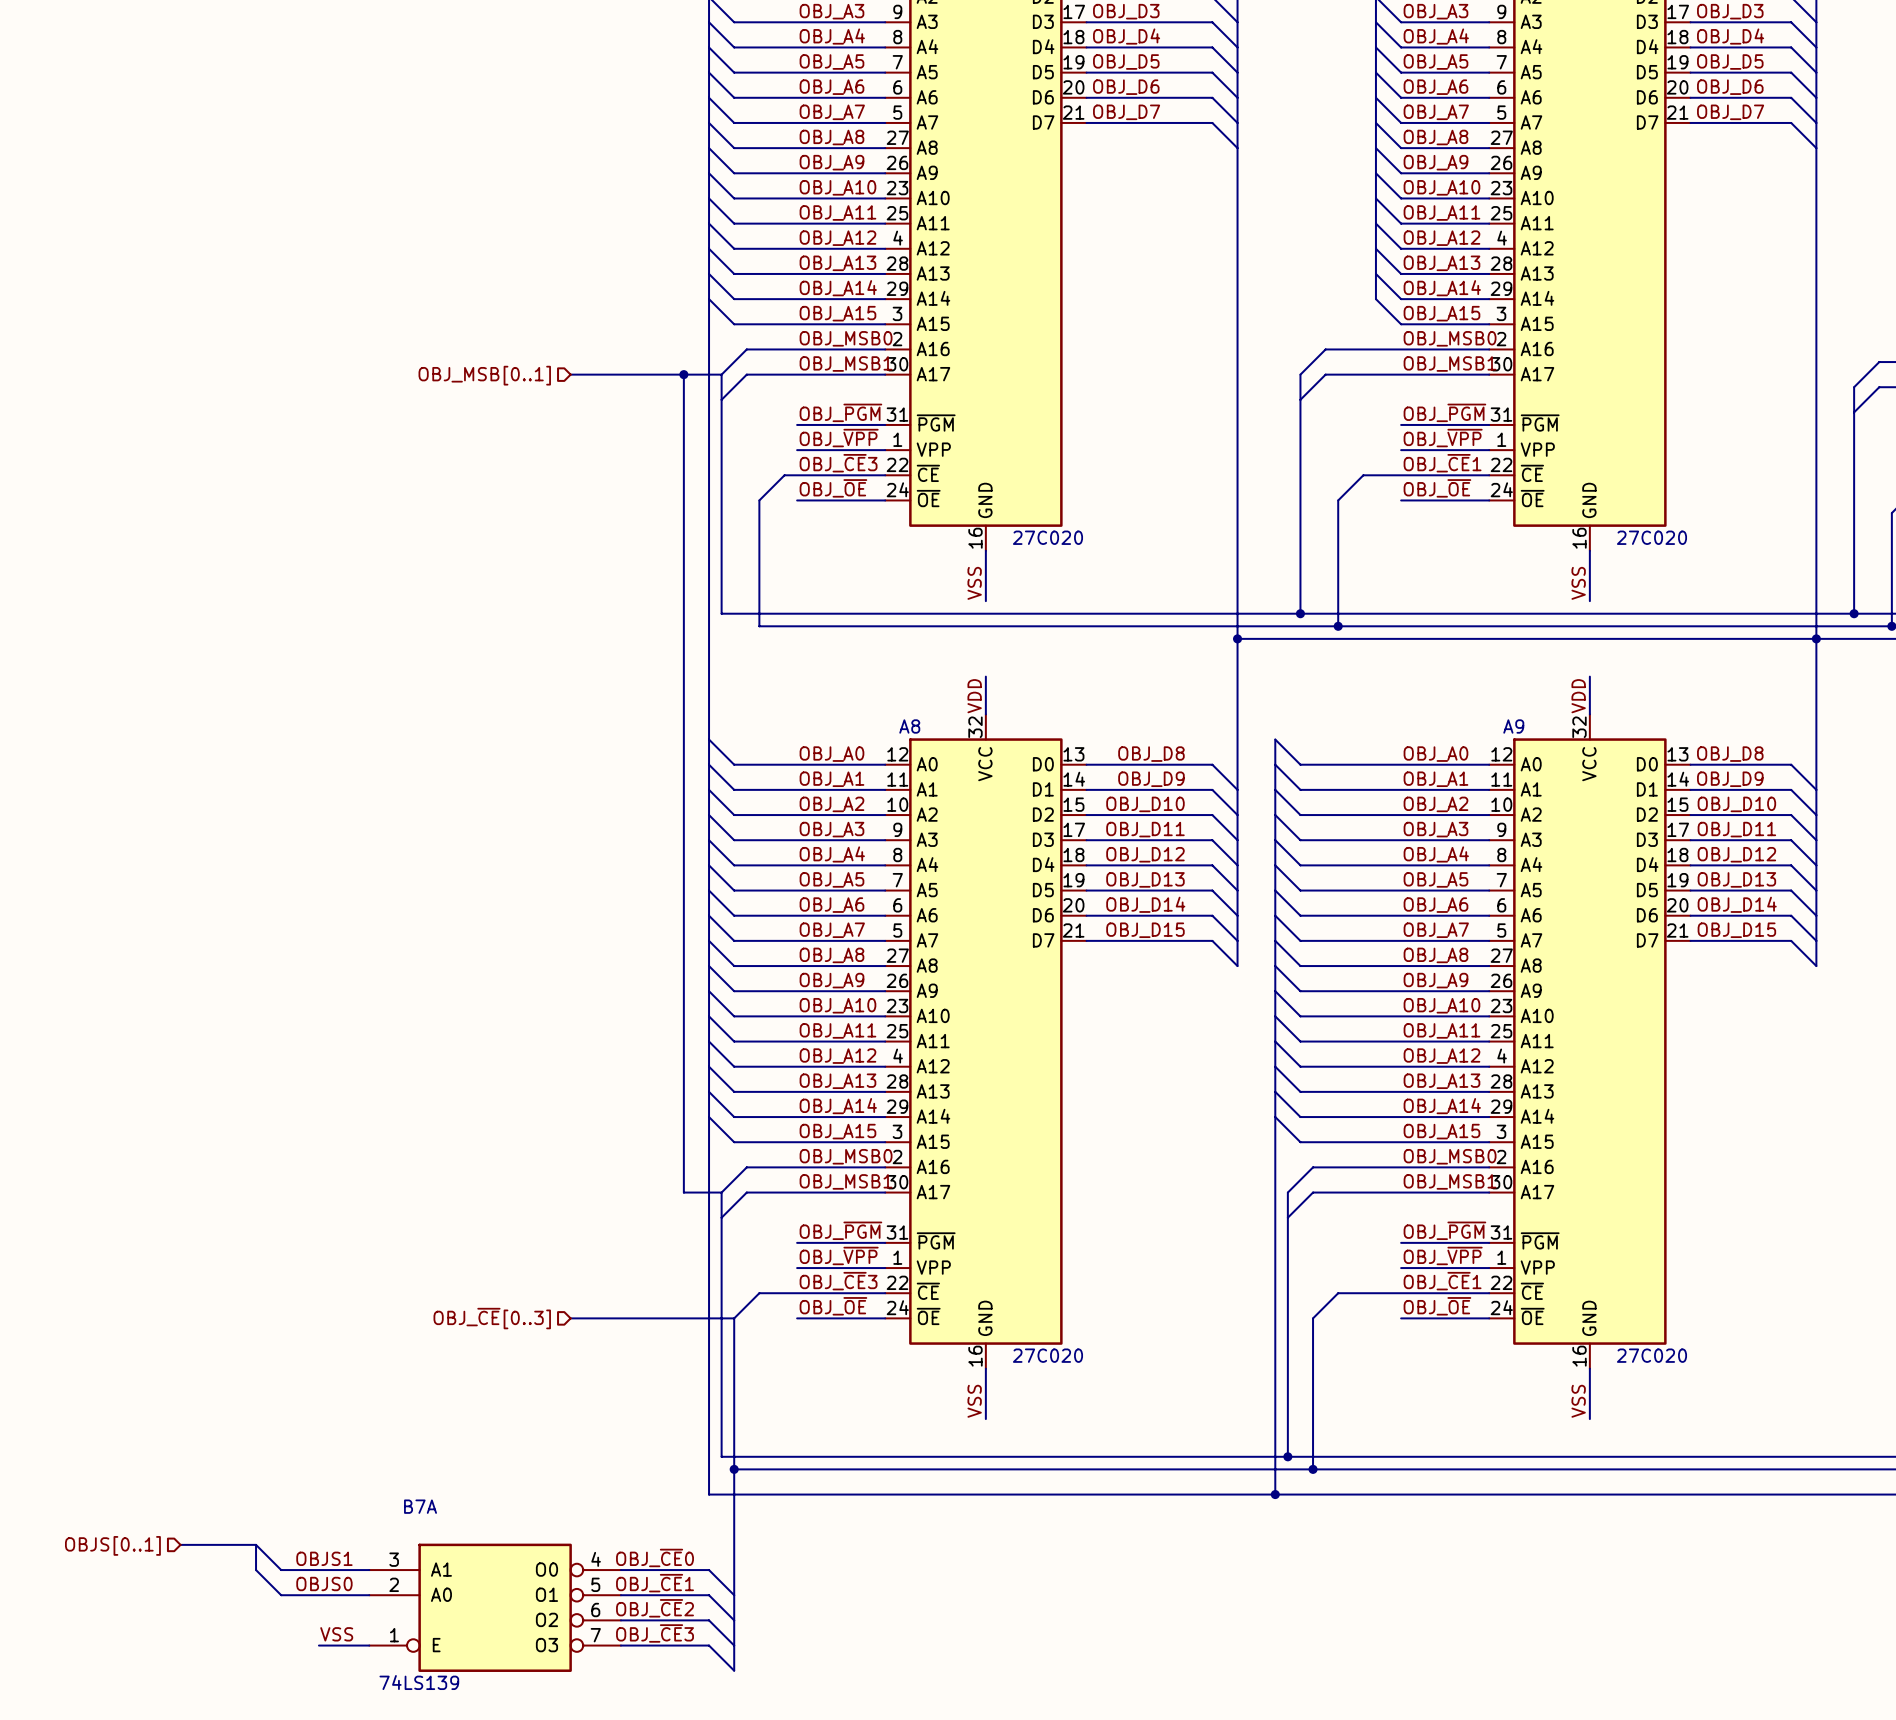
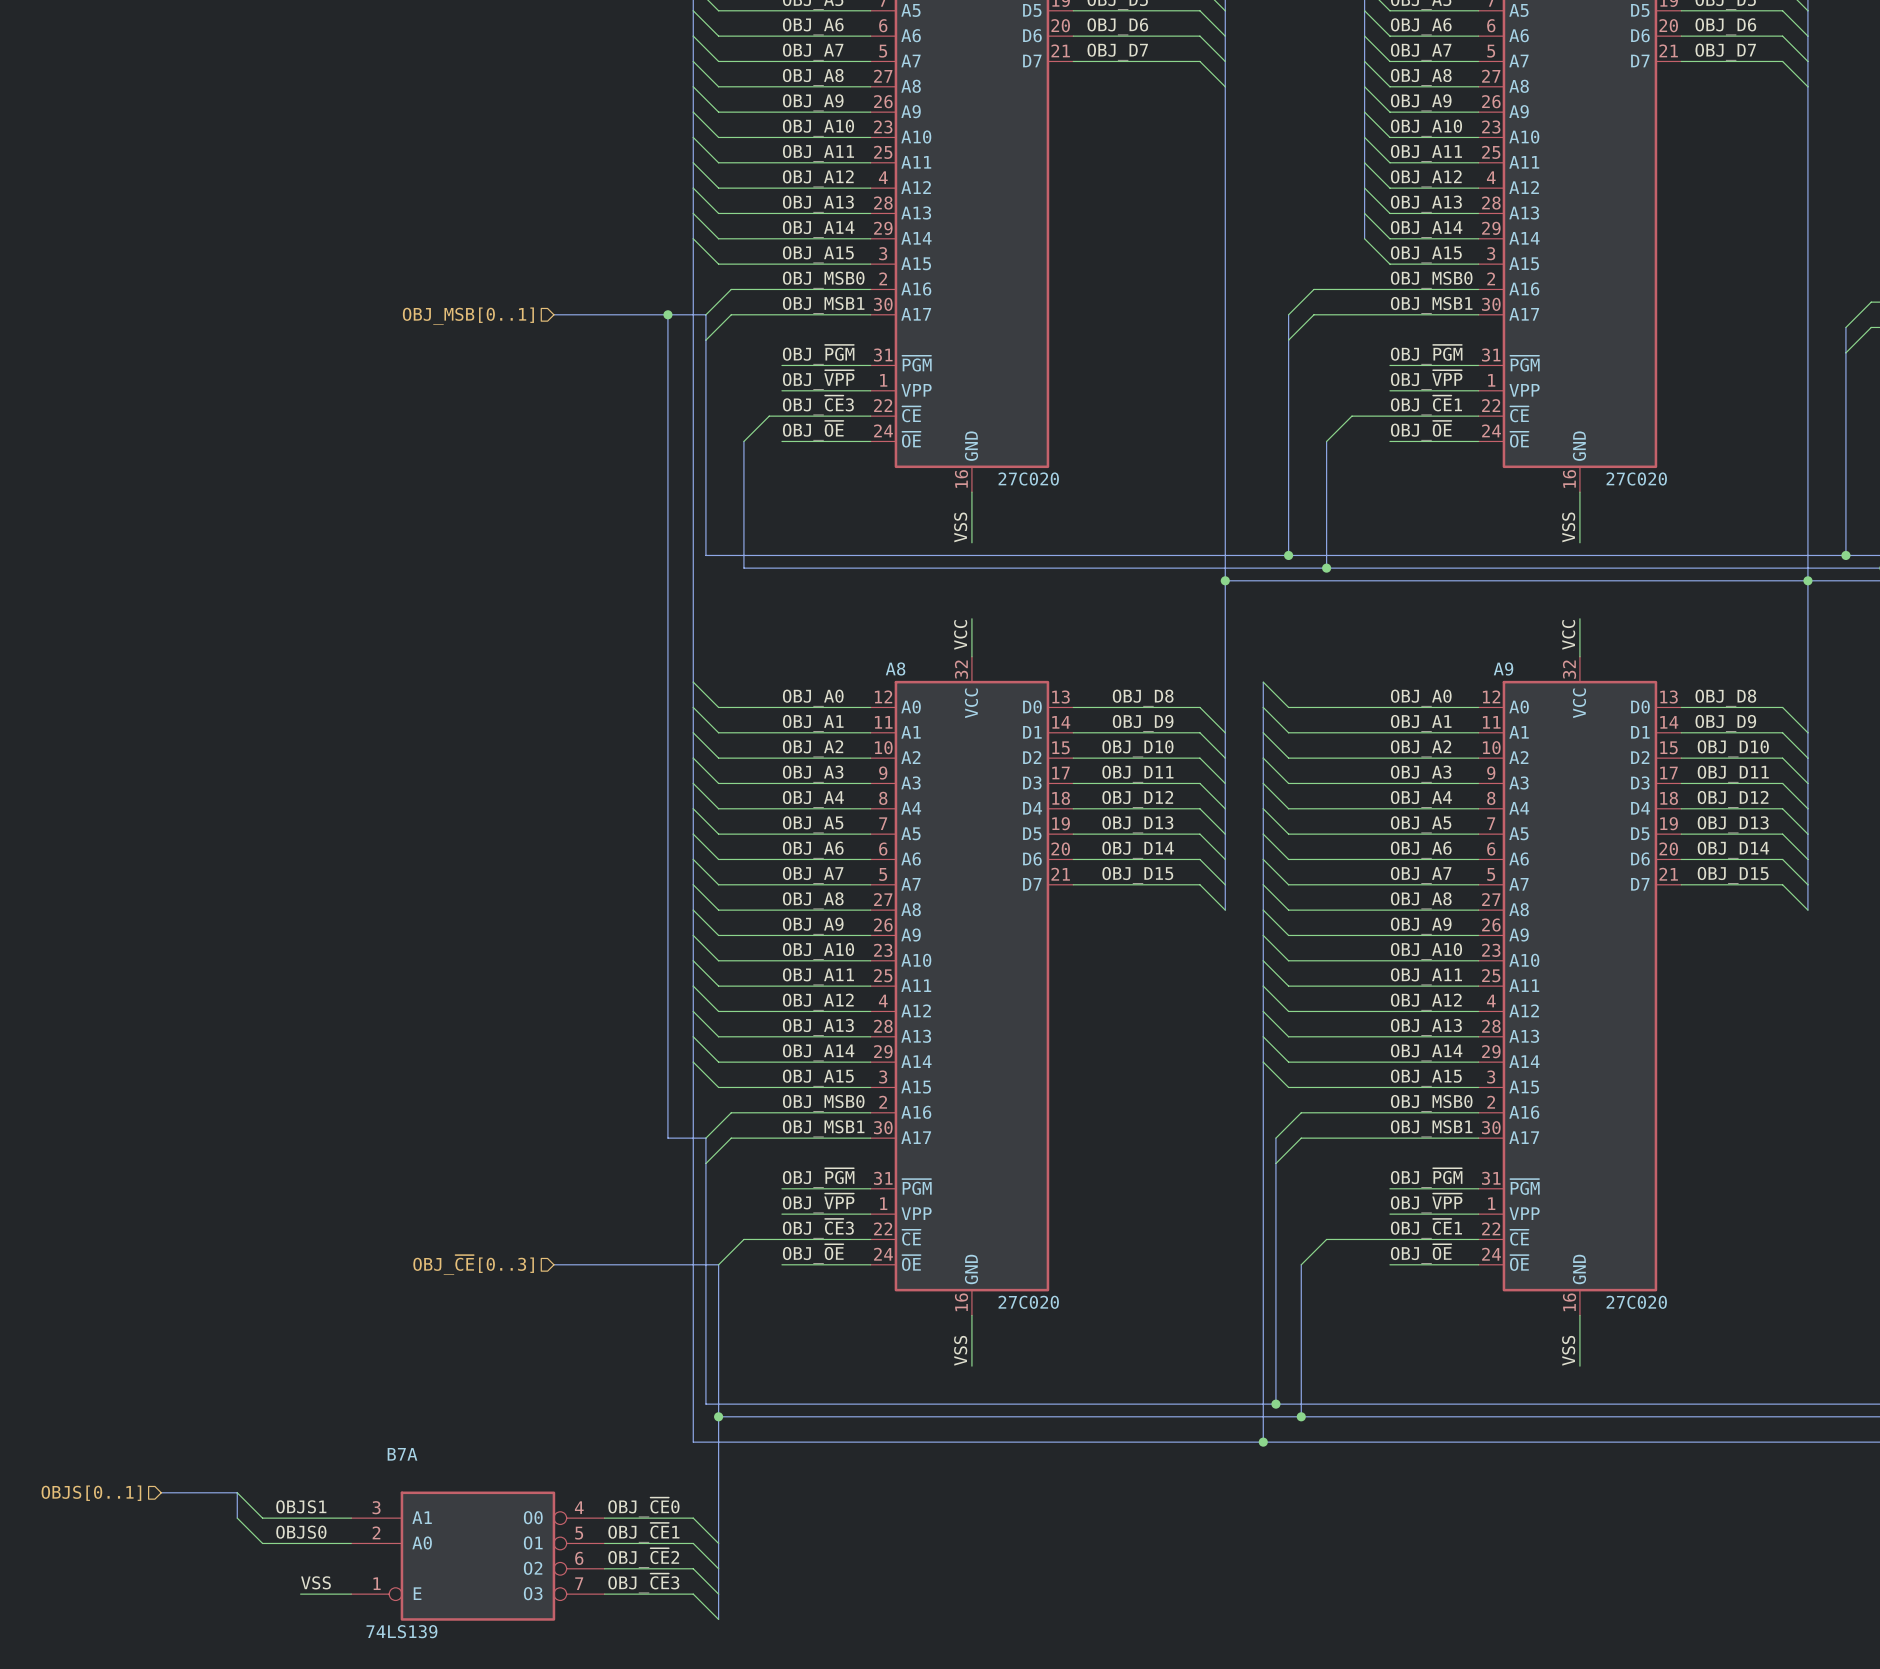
label: VDD (974, 696) -> VCC (960, 634)
label: VDD (1578, 696) -> VCC (1568, 634)

